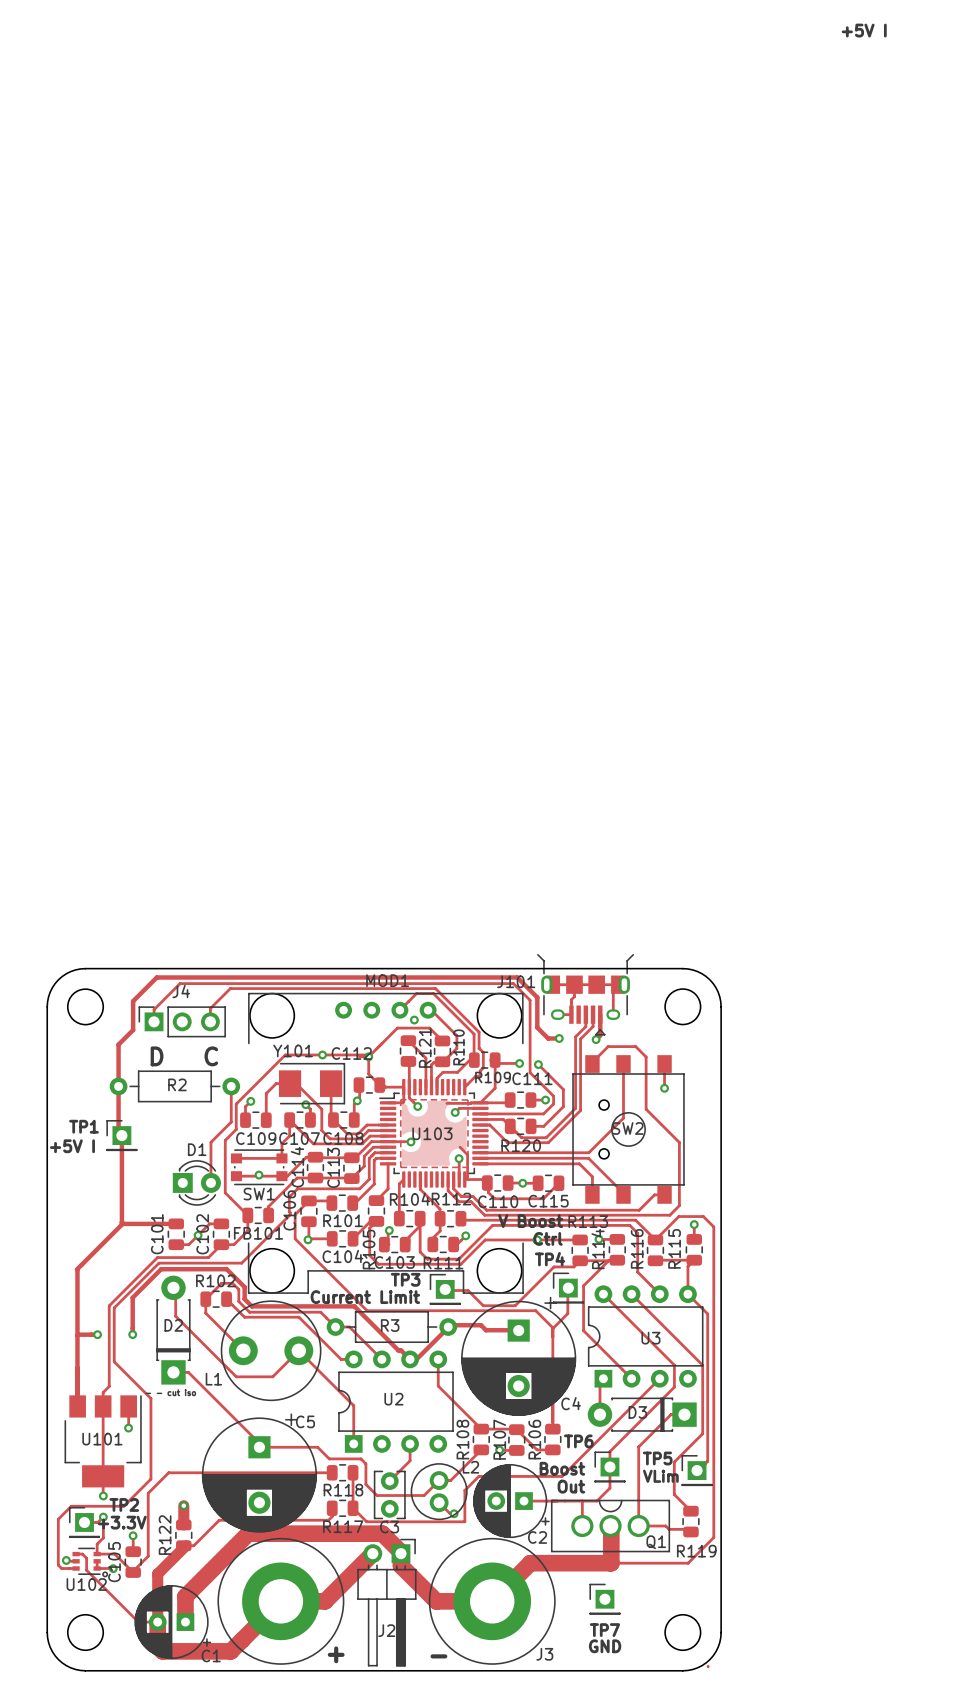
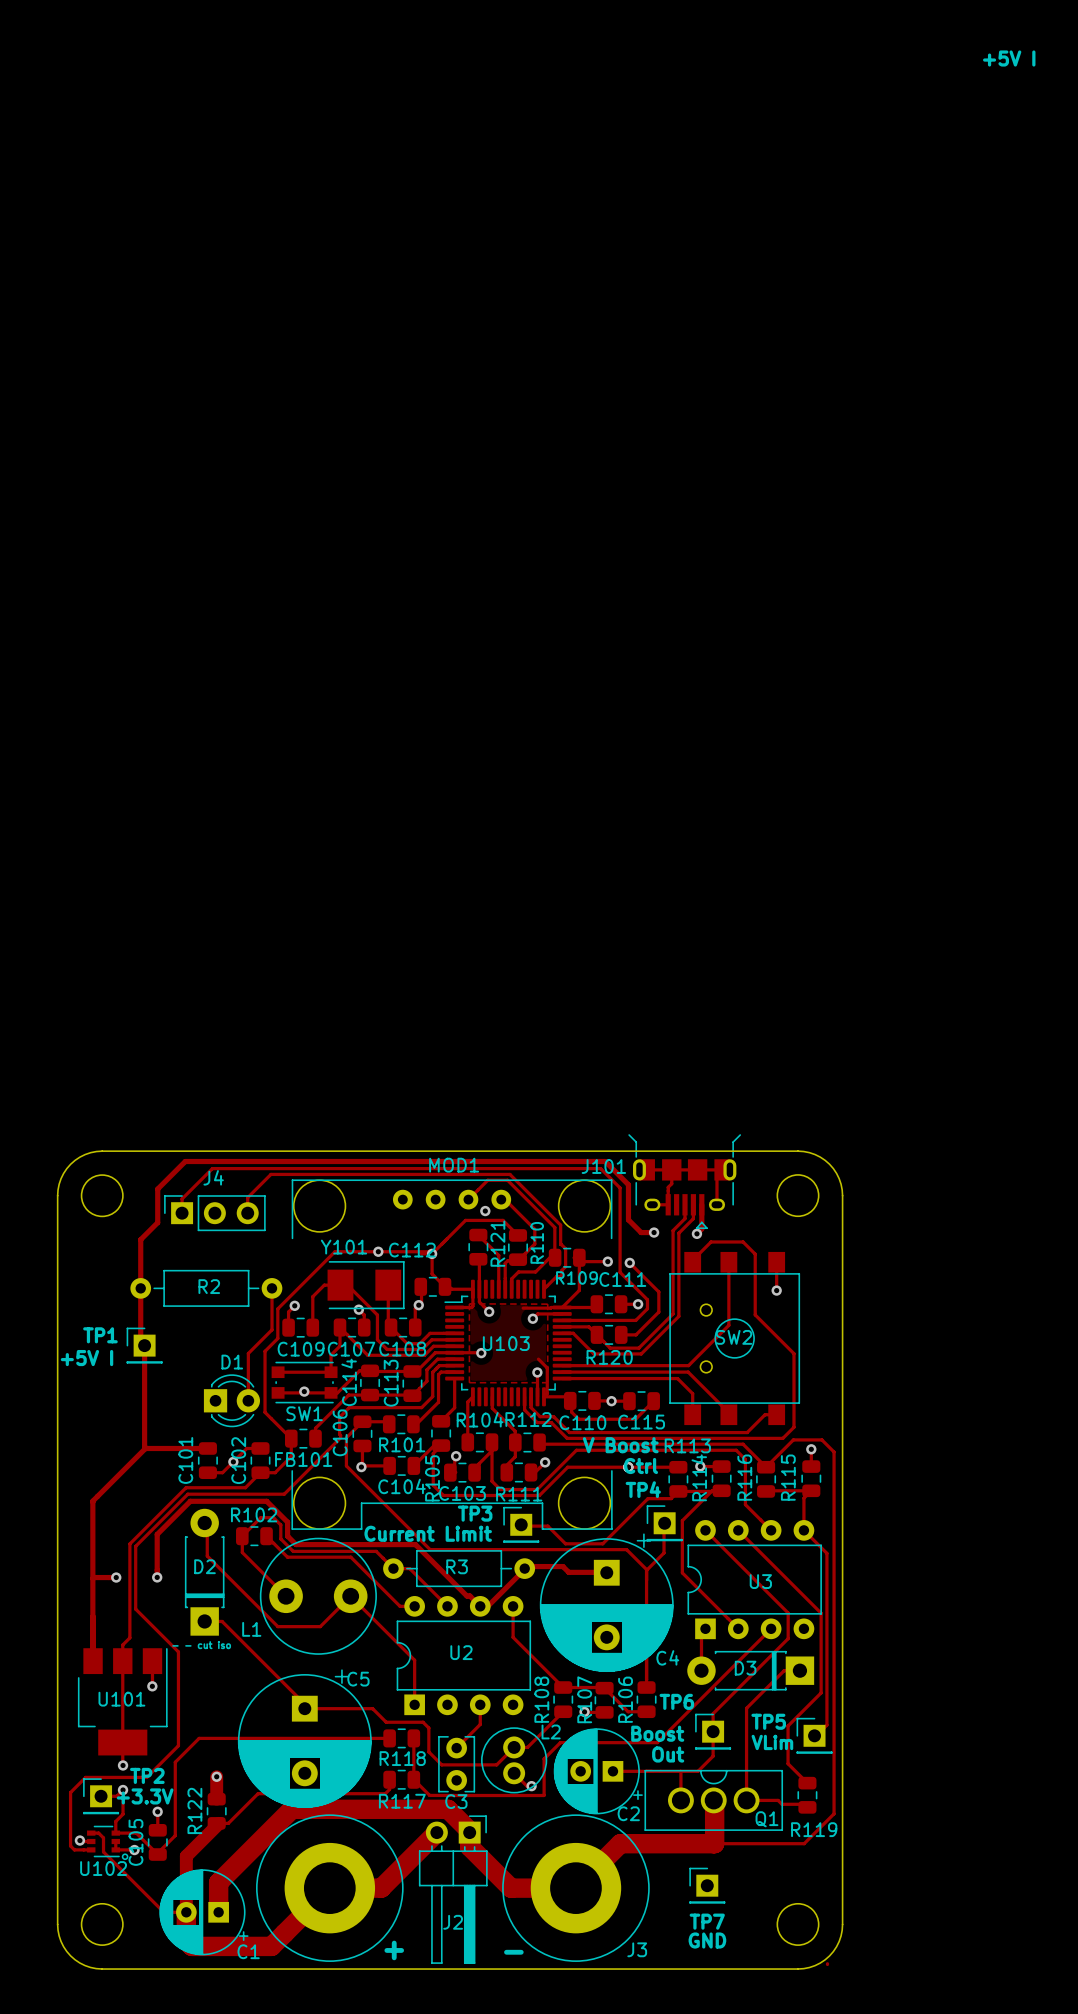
text: D C (184, 1056) -> none

